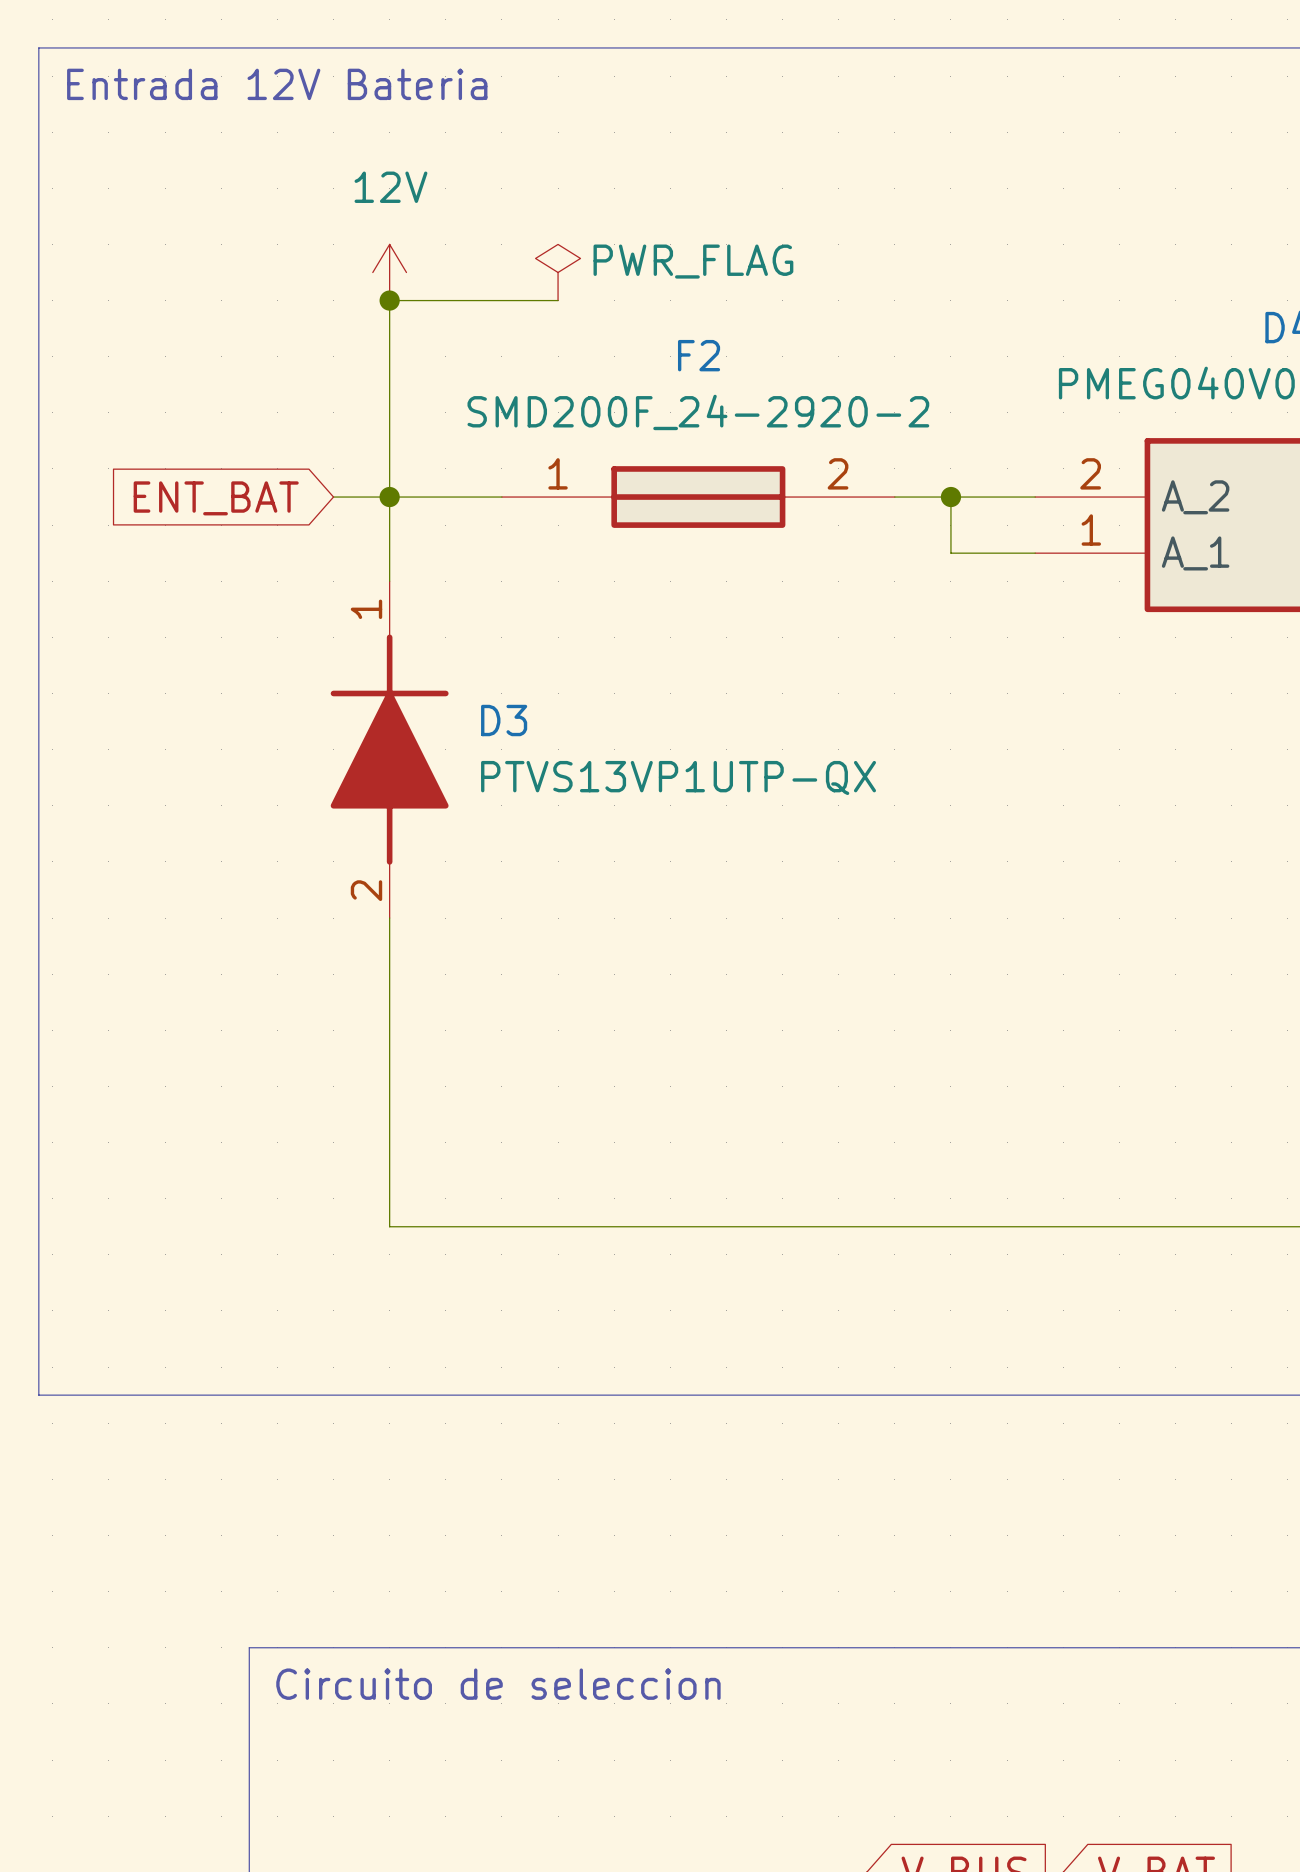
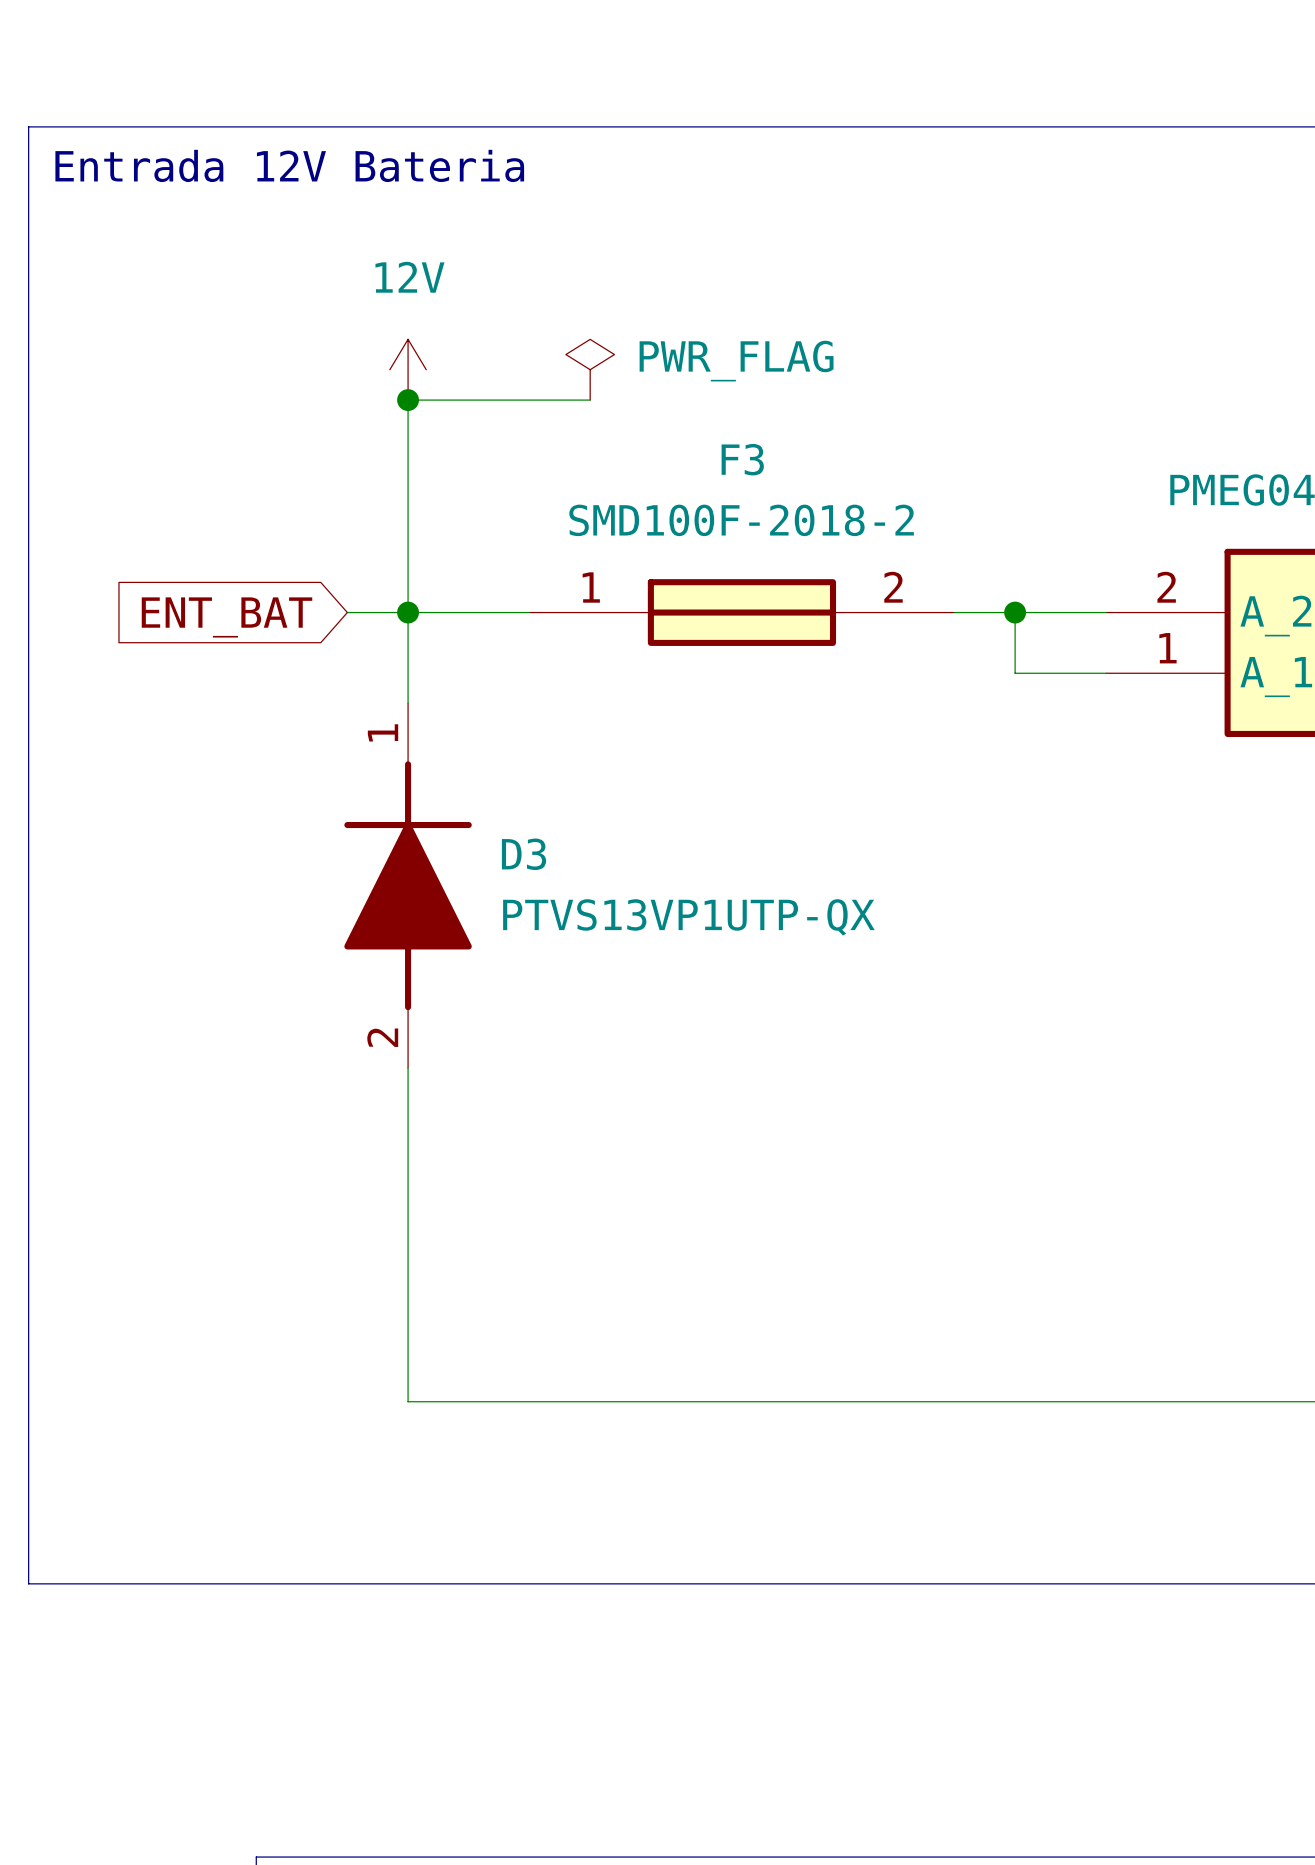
F2 name: F2 (699, 355) -> F3 (742, 459)
F2 value: SMD200F_24-2920-2 (698, 412) -> SMD100F-2018-2 (741, 520)

